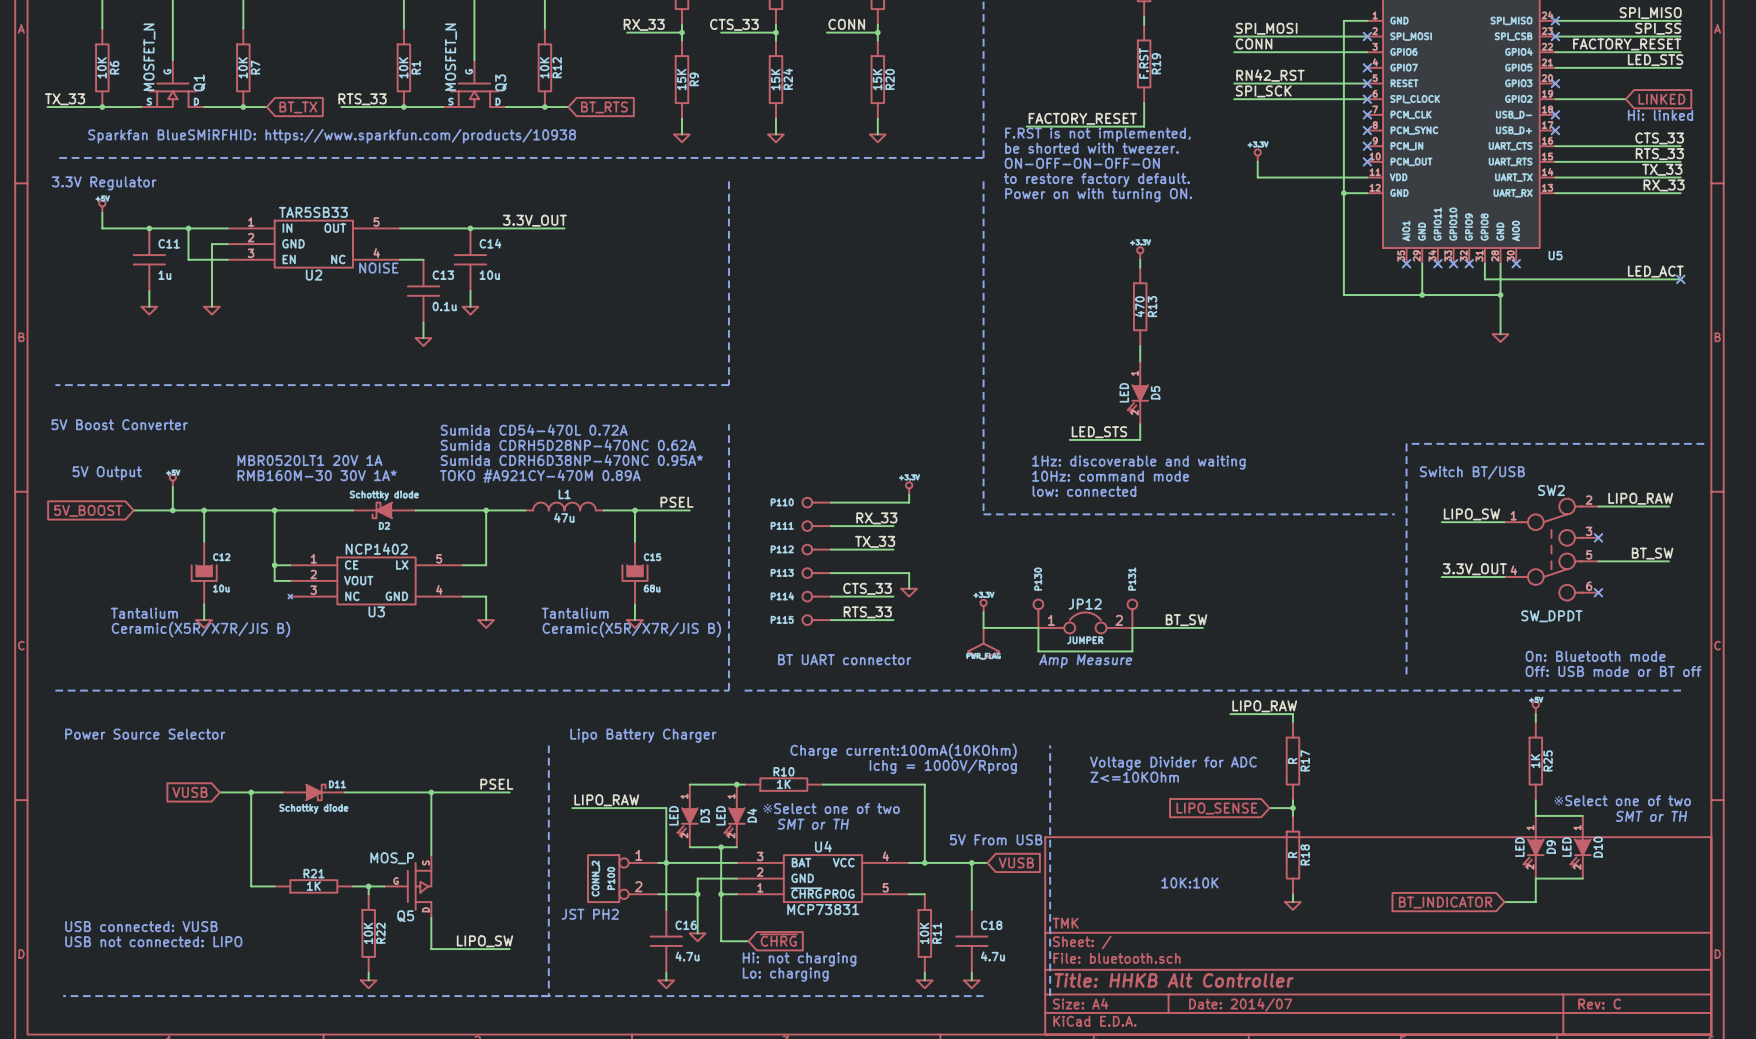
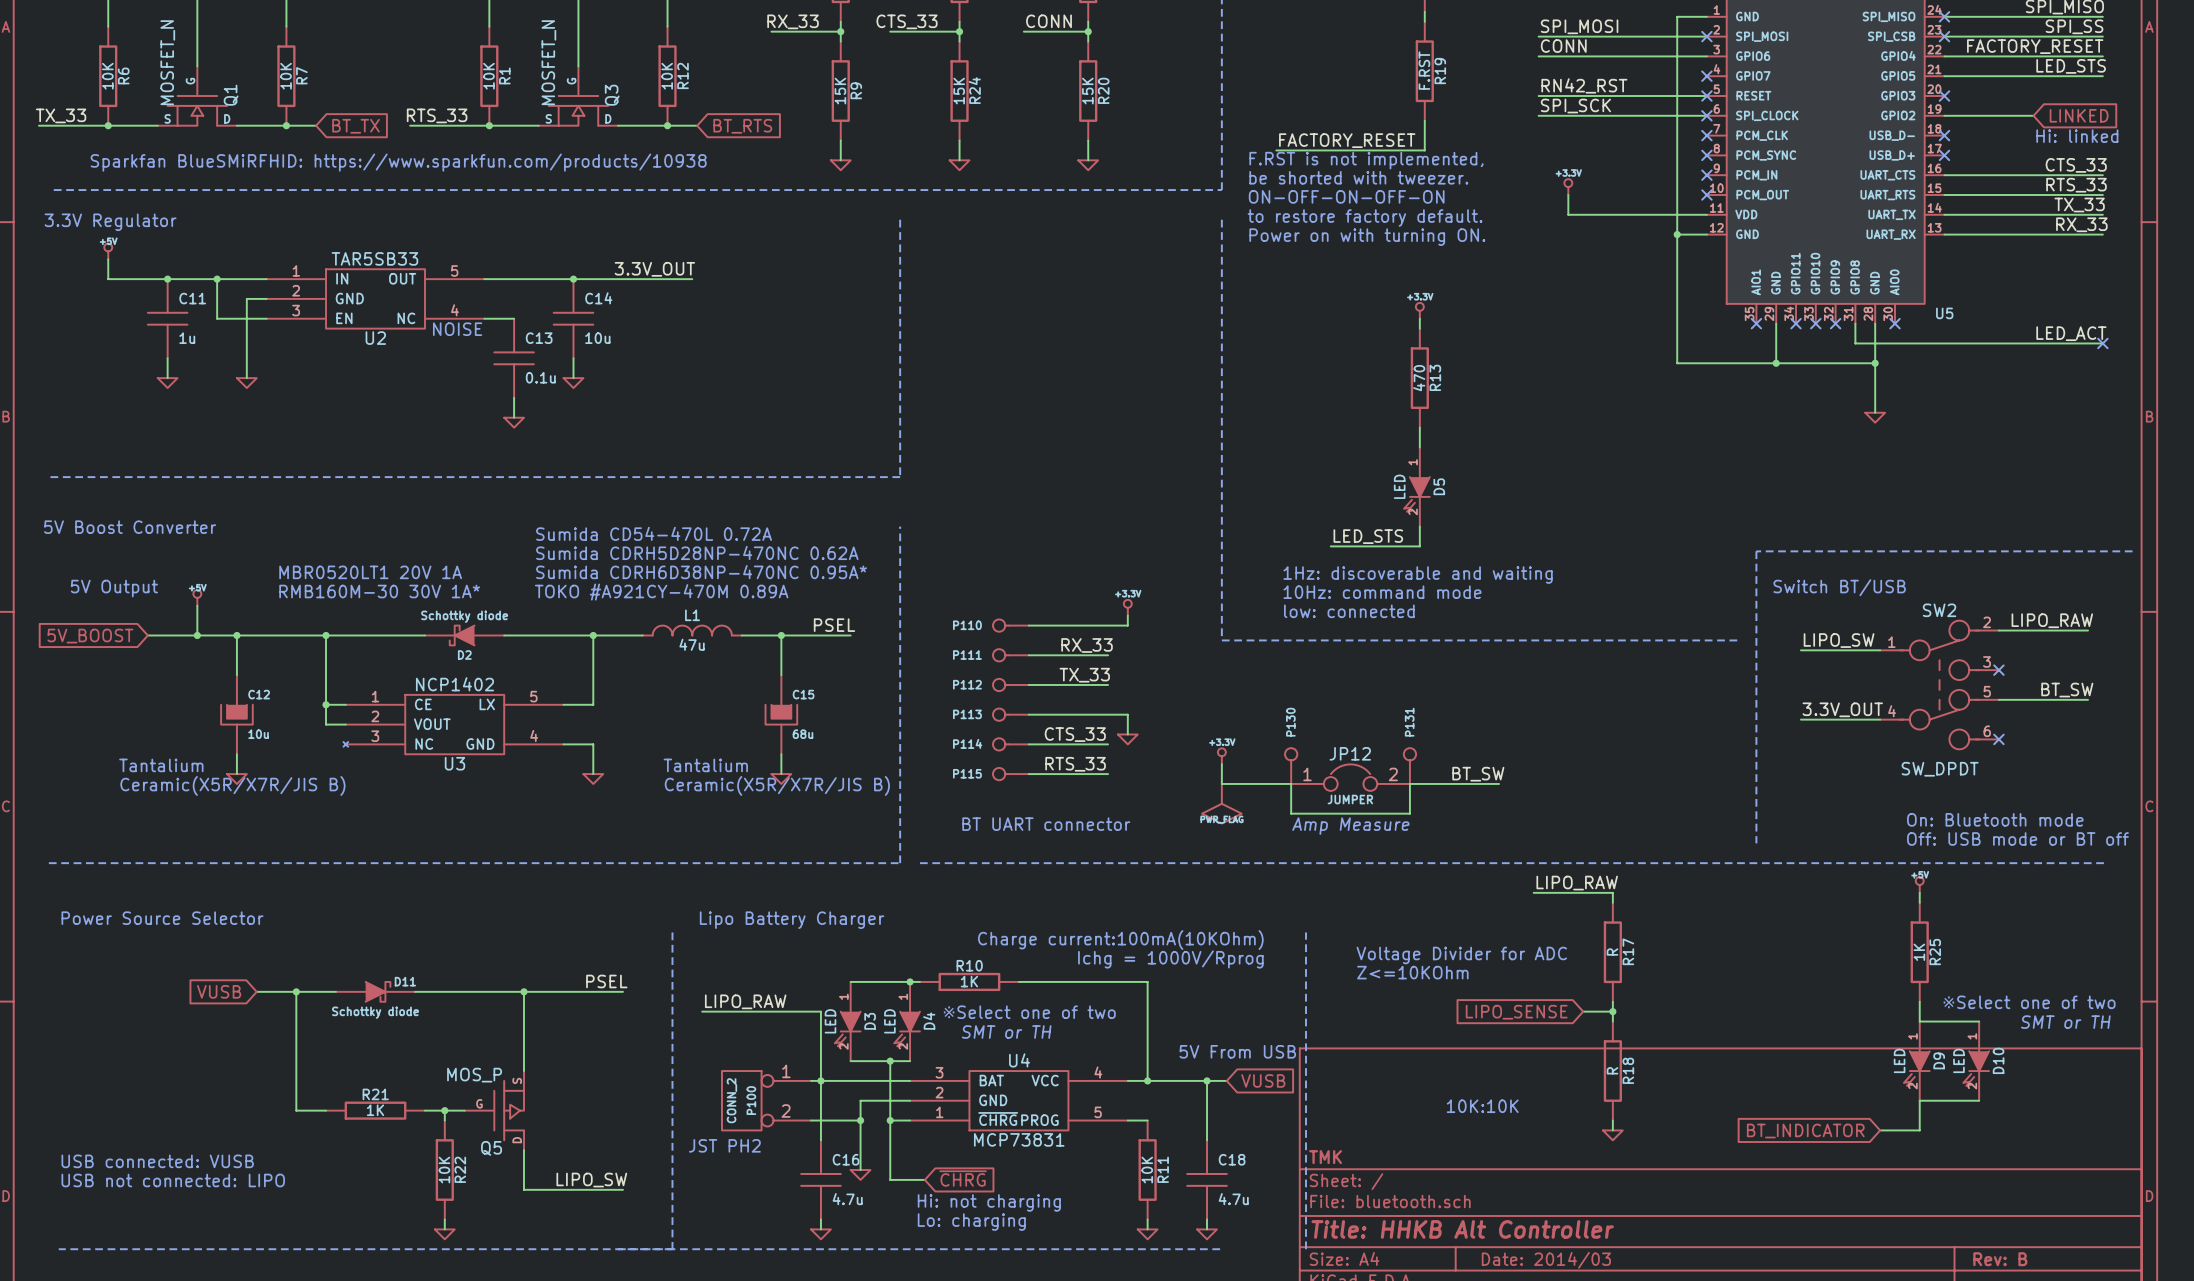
title block: Rev: C (1599, 1003) -> Rev: B (2000, 1259)
title block: Date: 2014/07 (1240, 1004) -> Date: 2014/03 (1546, 1260)

